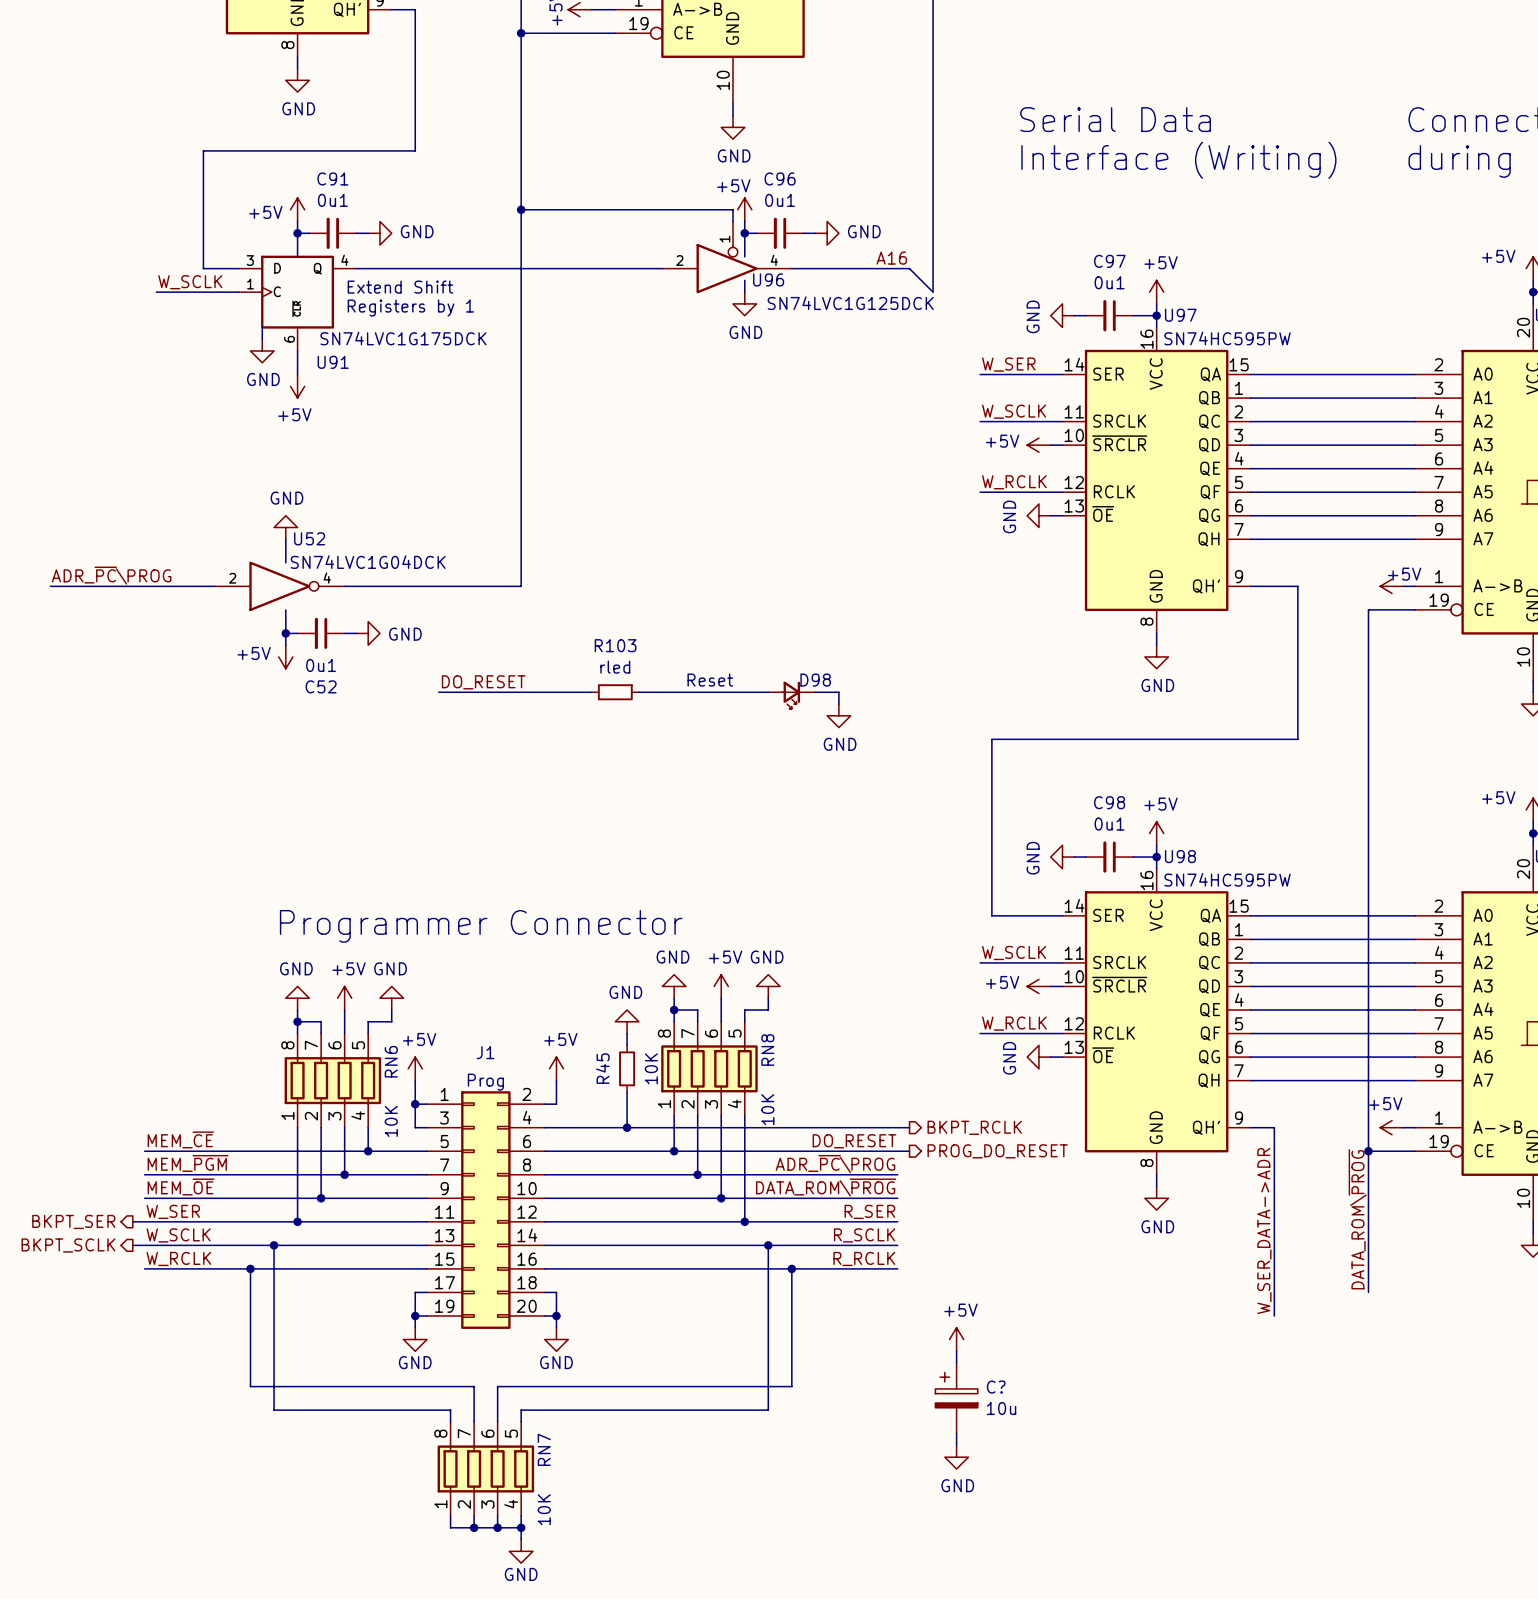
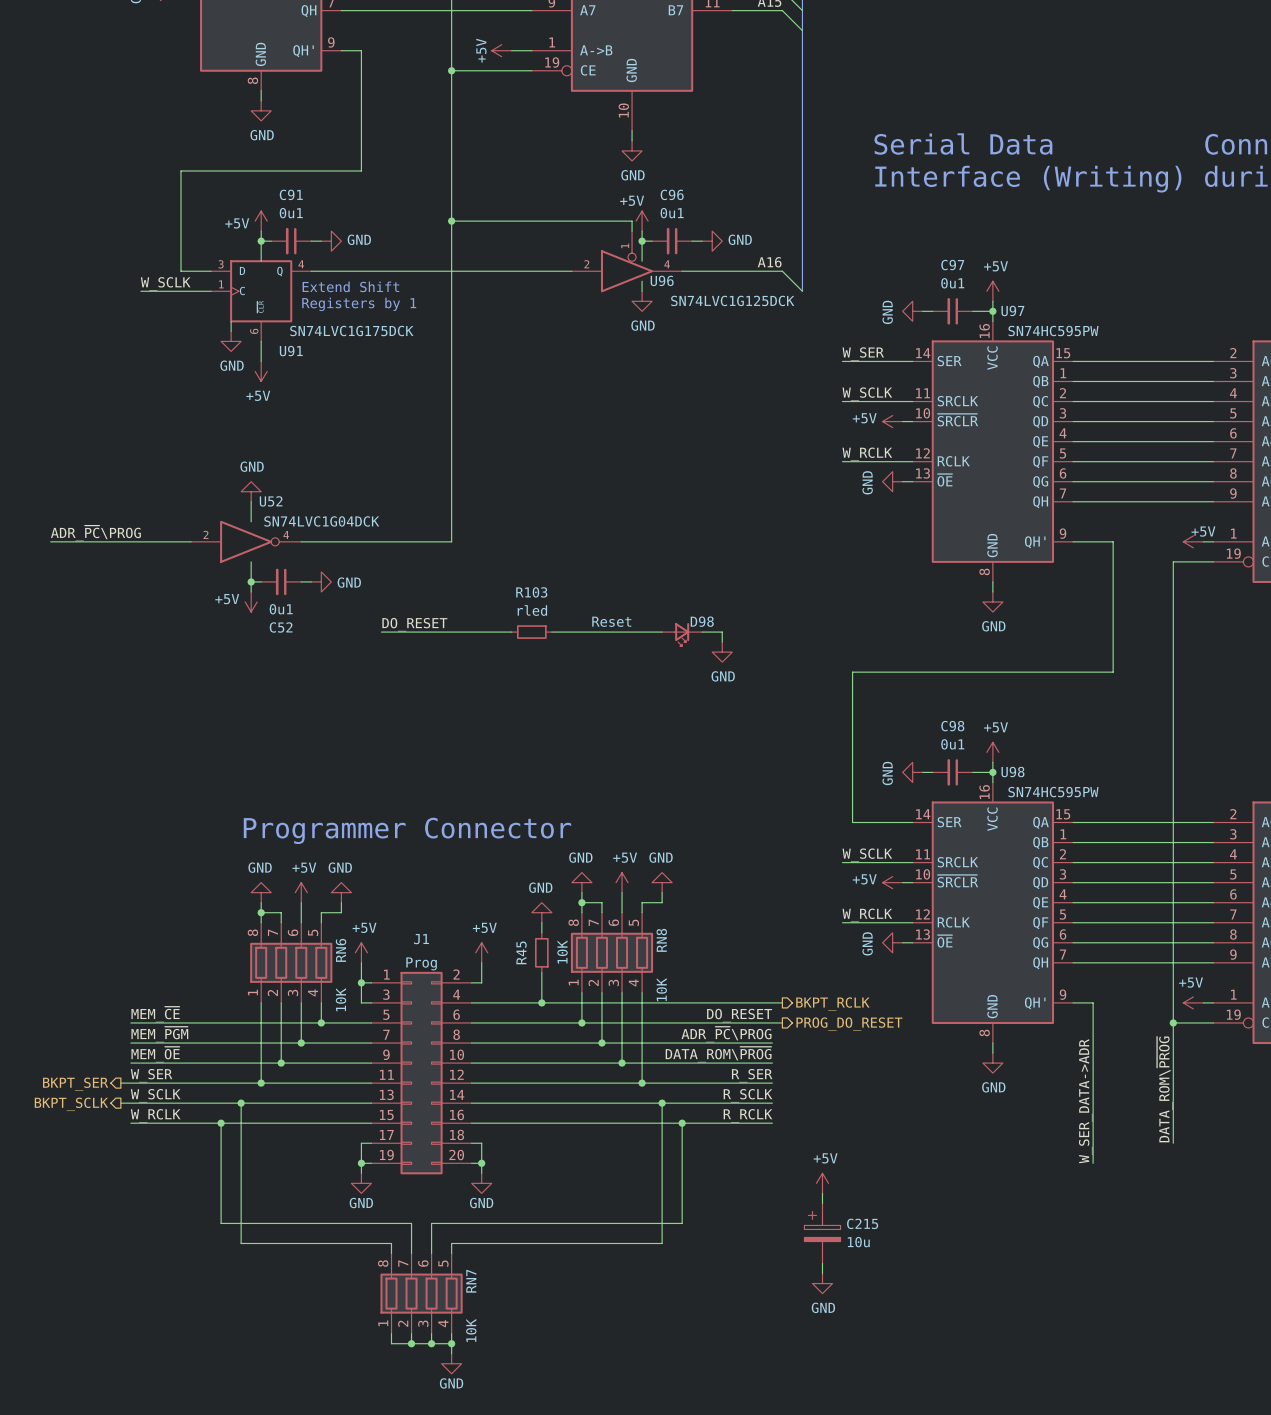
C? name: C? (996, 1387) -> C215 (862, 1223)

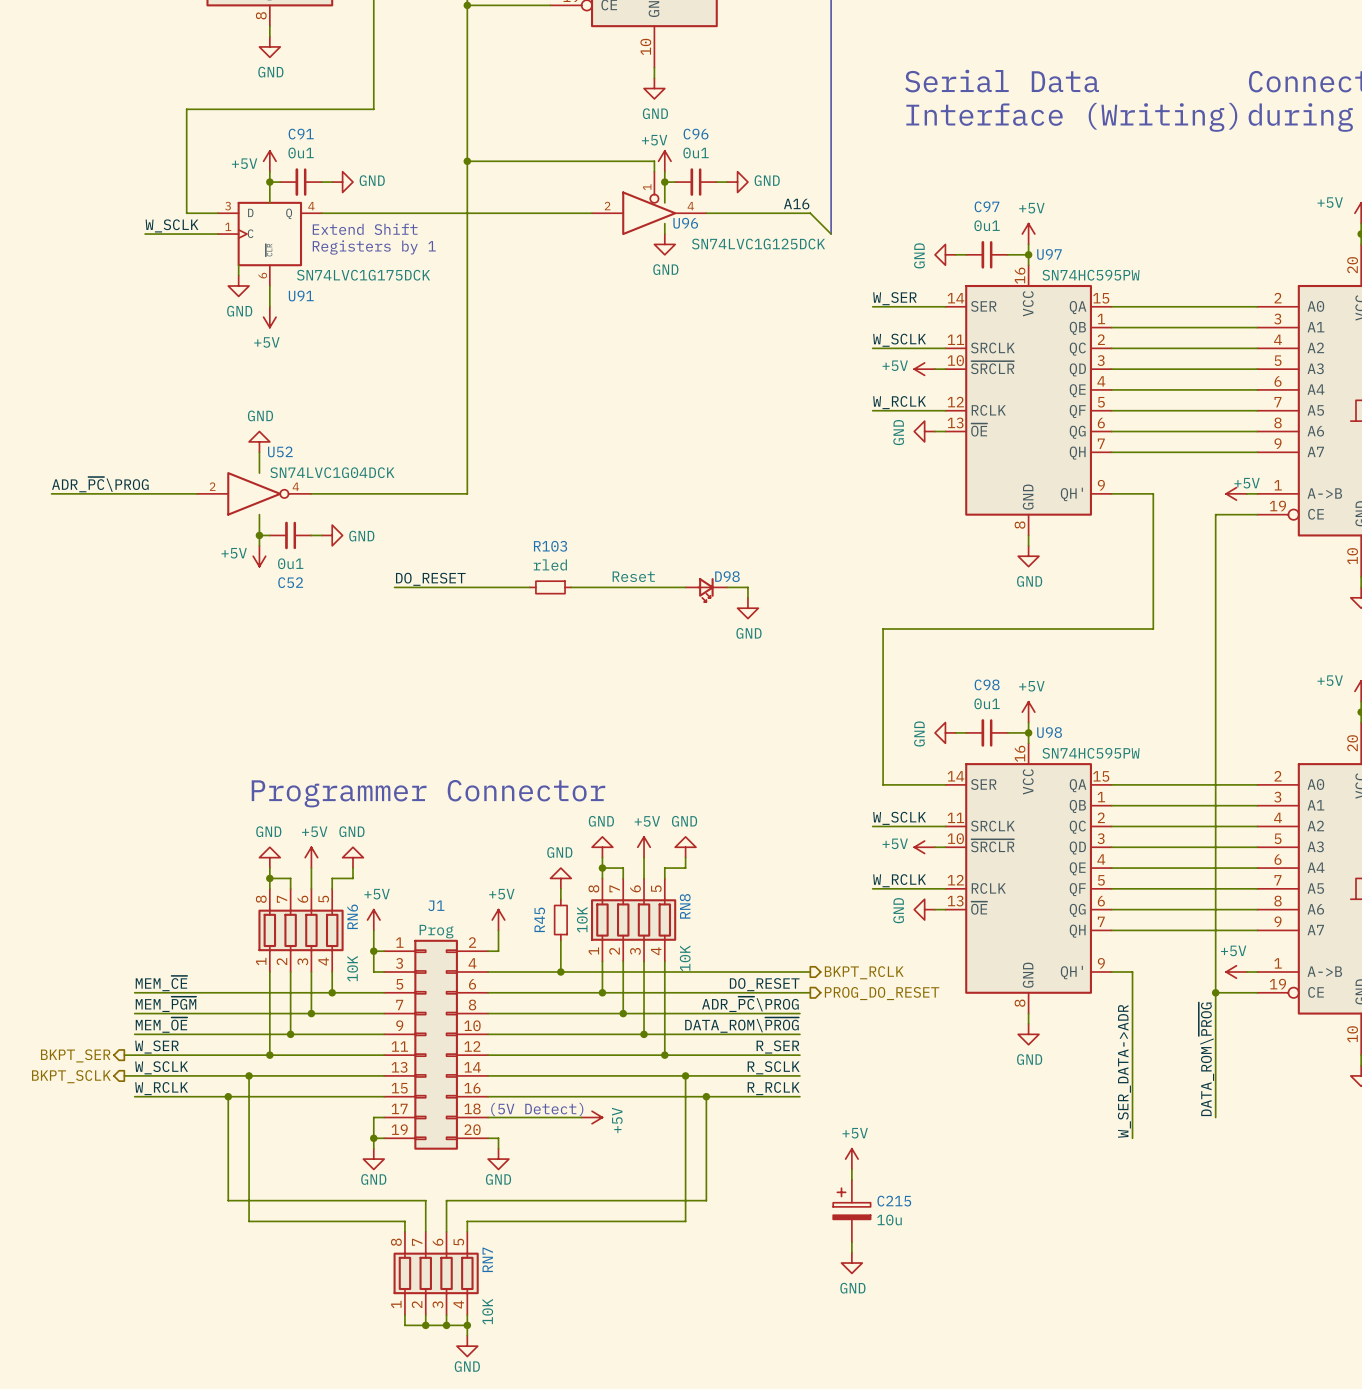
text: none -> (5V Detect) (537, 1109)
wire: (481, 1143) (481, 1163) -> (498, 1117) (581, 1117)
power symbol: none -> +5V (592, 1117)
junction: (481, 1163) -> none

